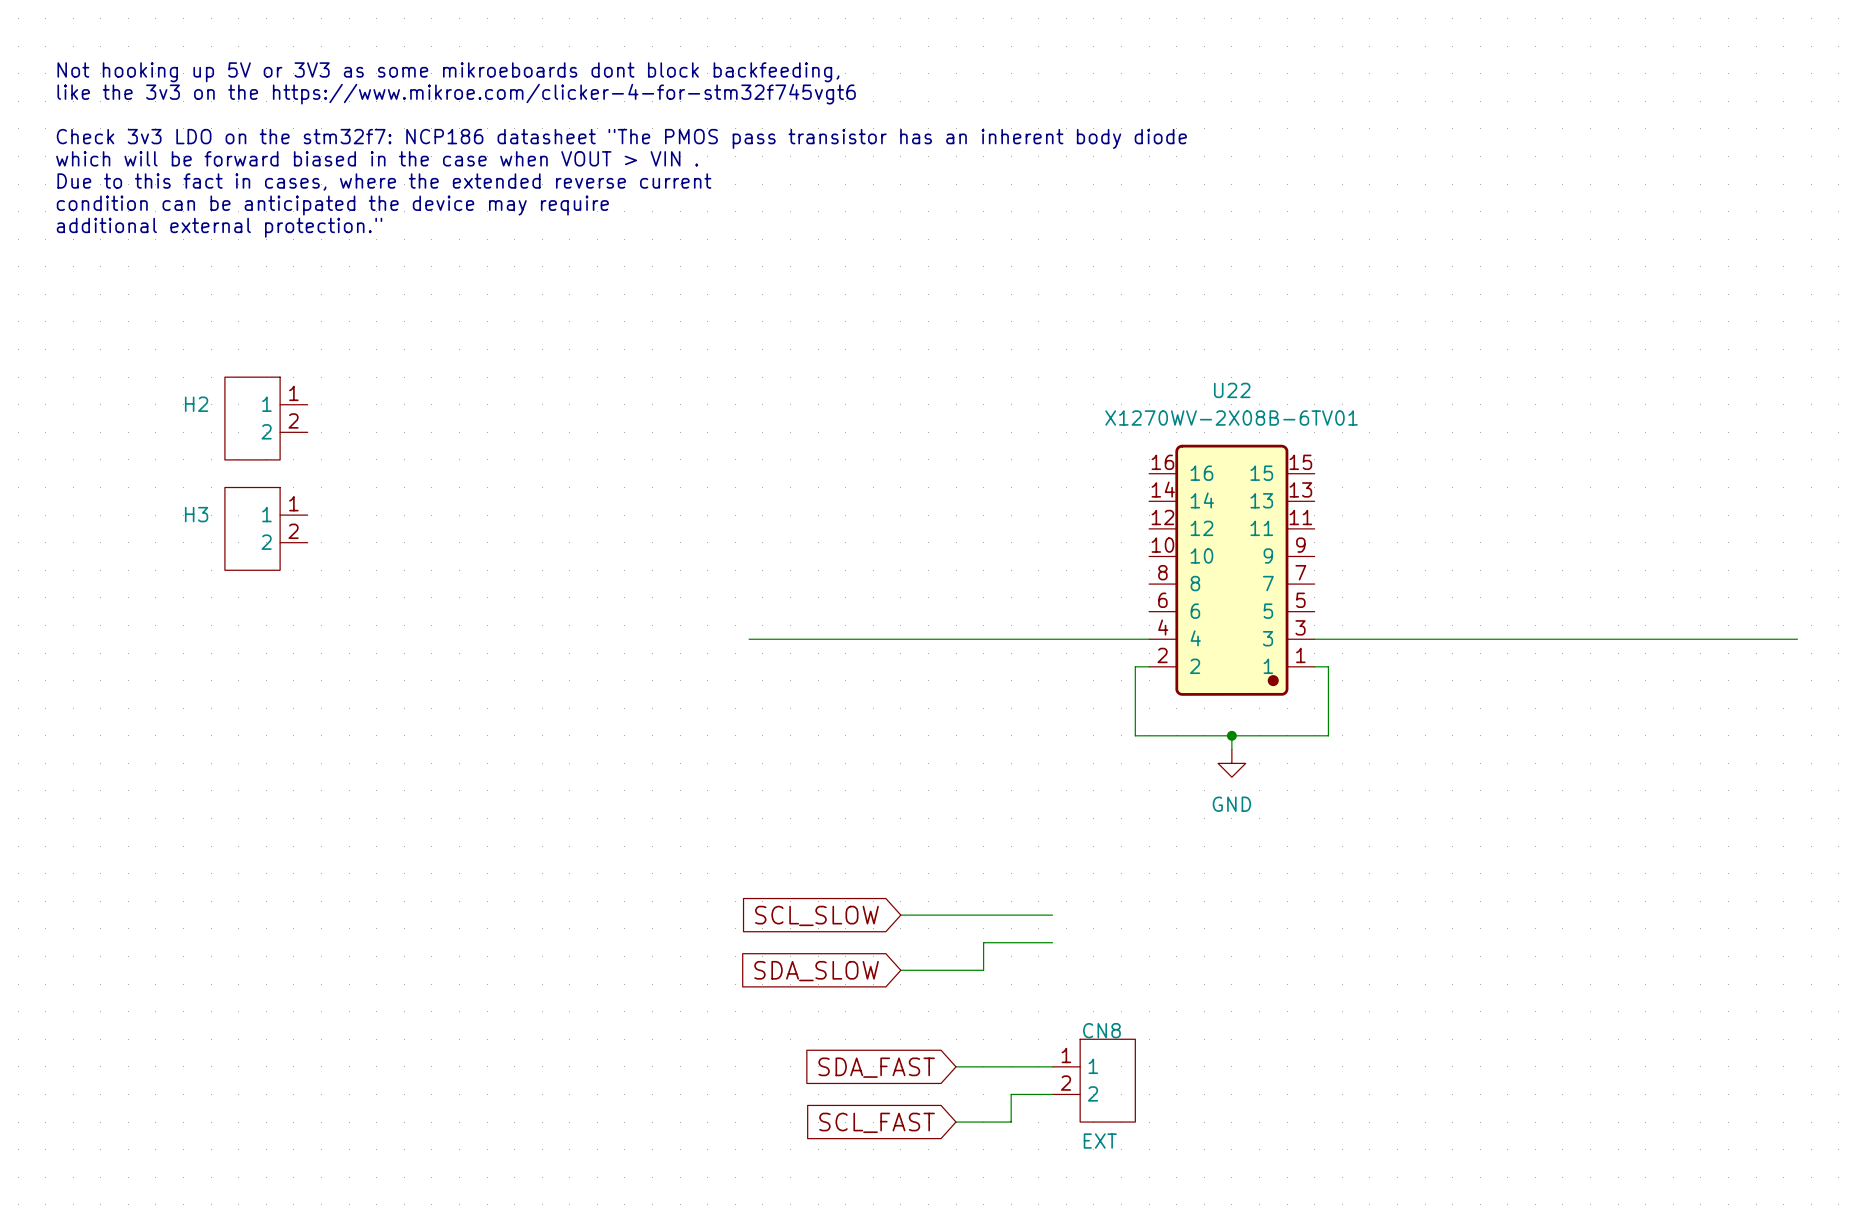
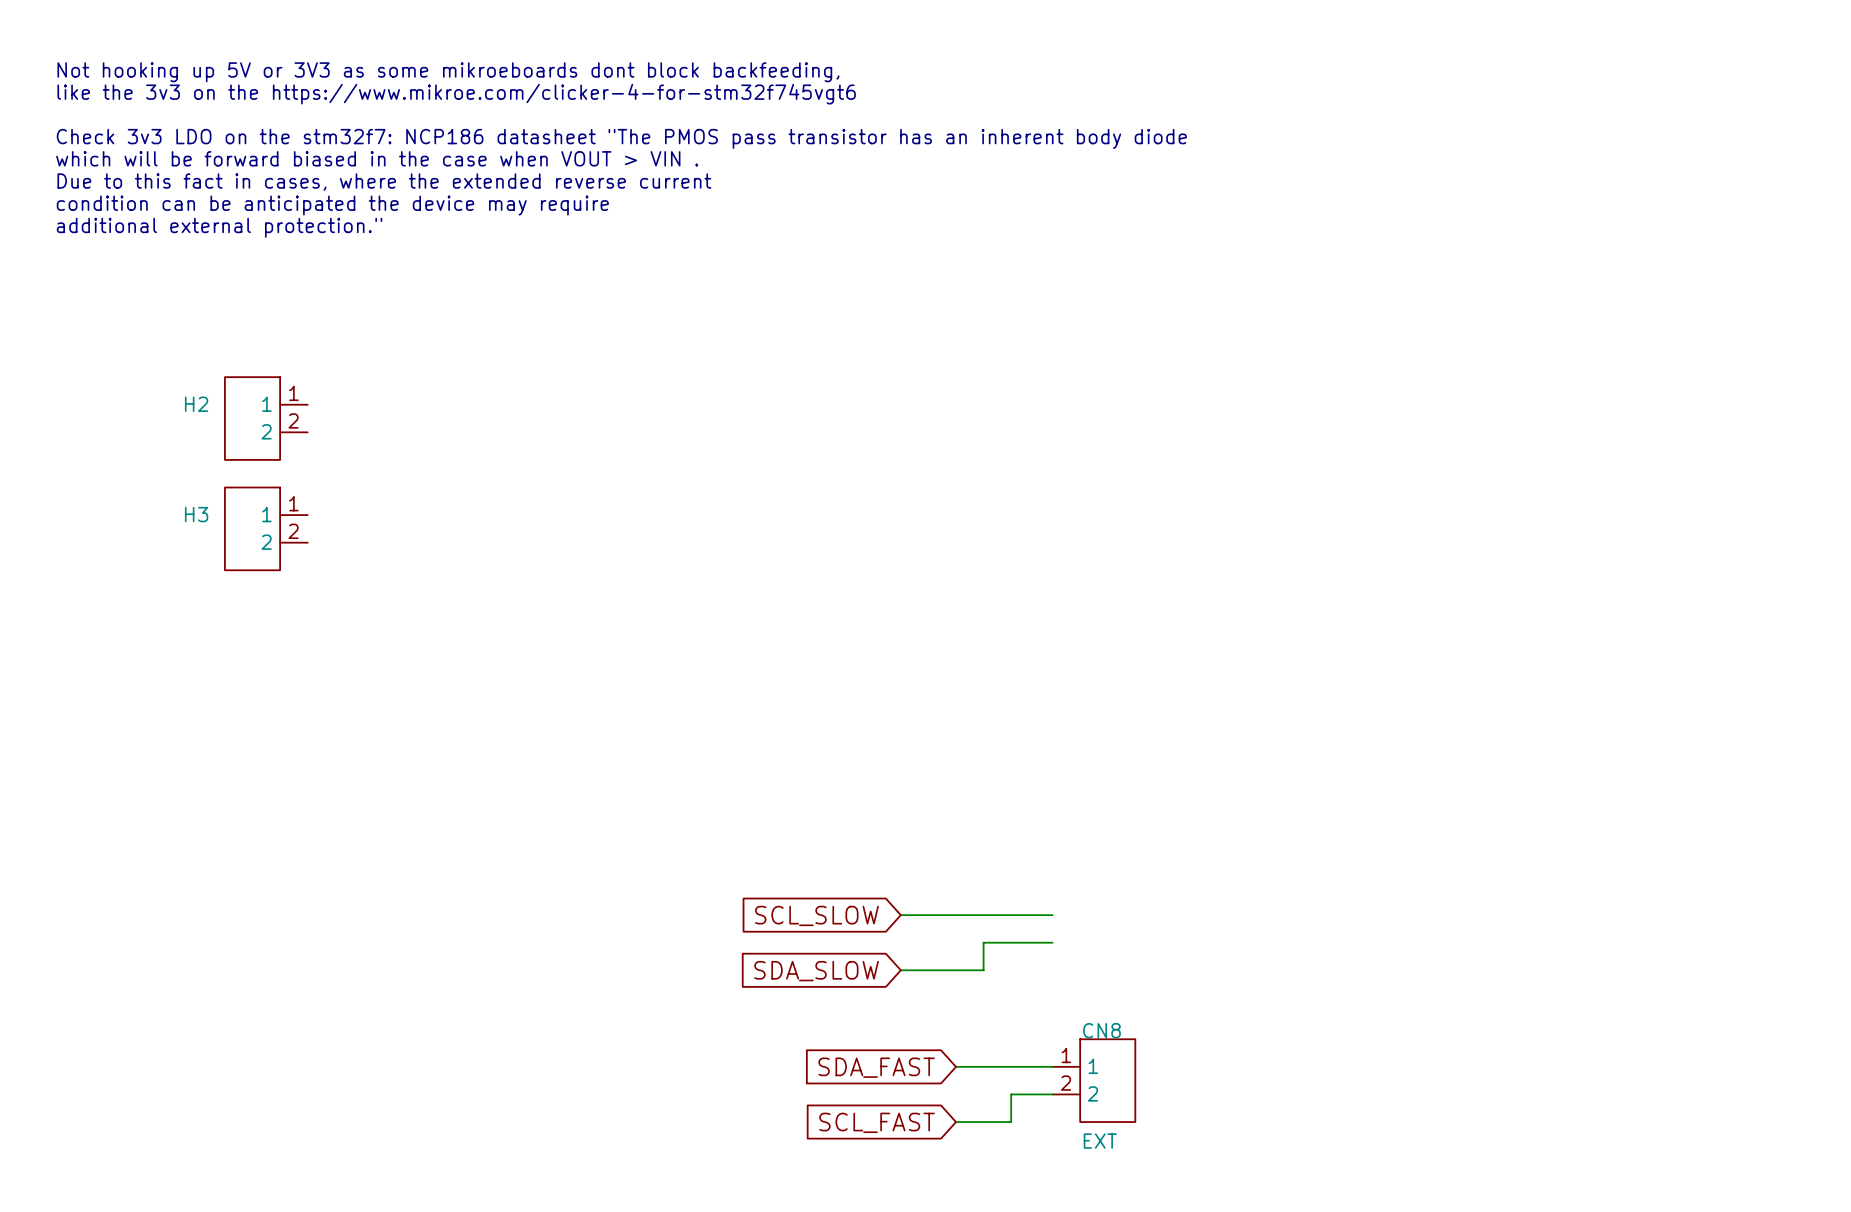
U22: X1270WV-2X08B-6TV01 (1231, 570) -> none
wire: (749, 639) (1149, 639) -> none
wire: (1314, 639) (1797, 639) -> none
wire: (1149, 666) (1135, 666) (1135, 735) (1328, 735) (1328, 666) (1314, 666) -> none
wire: (1231, 735) (1231, 749) -> none
junction: (1231, 735) -> none
power symbol: GND (1231, 763) -> none

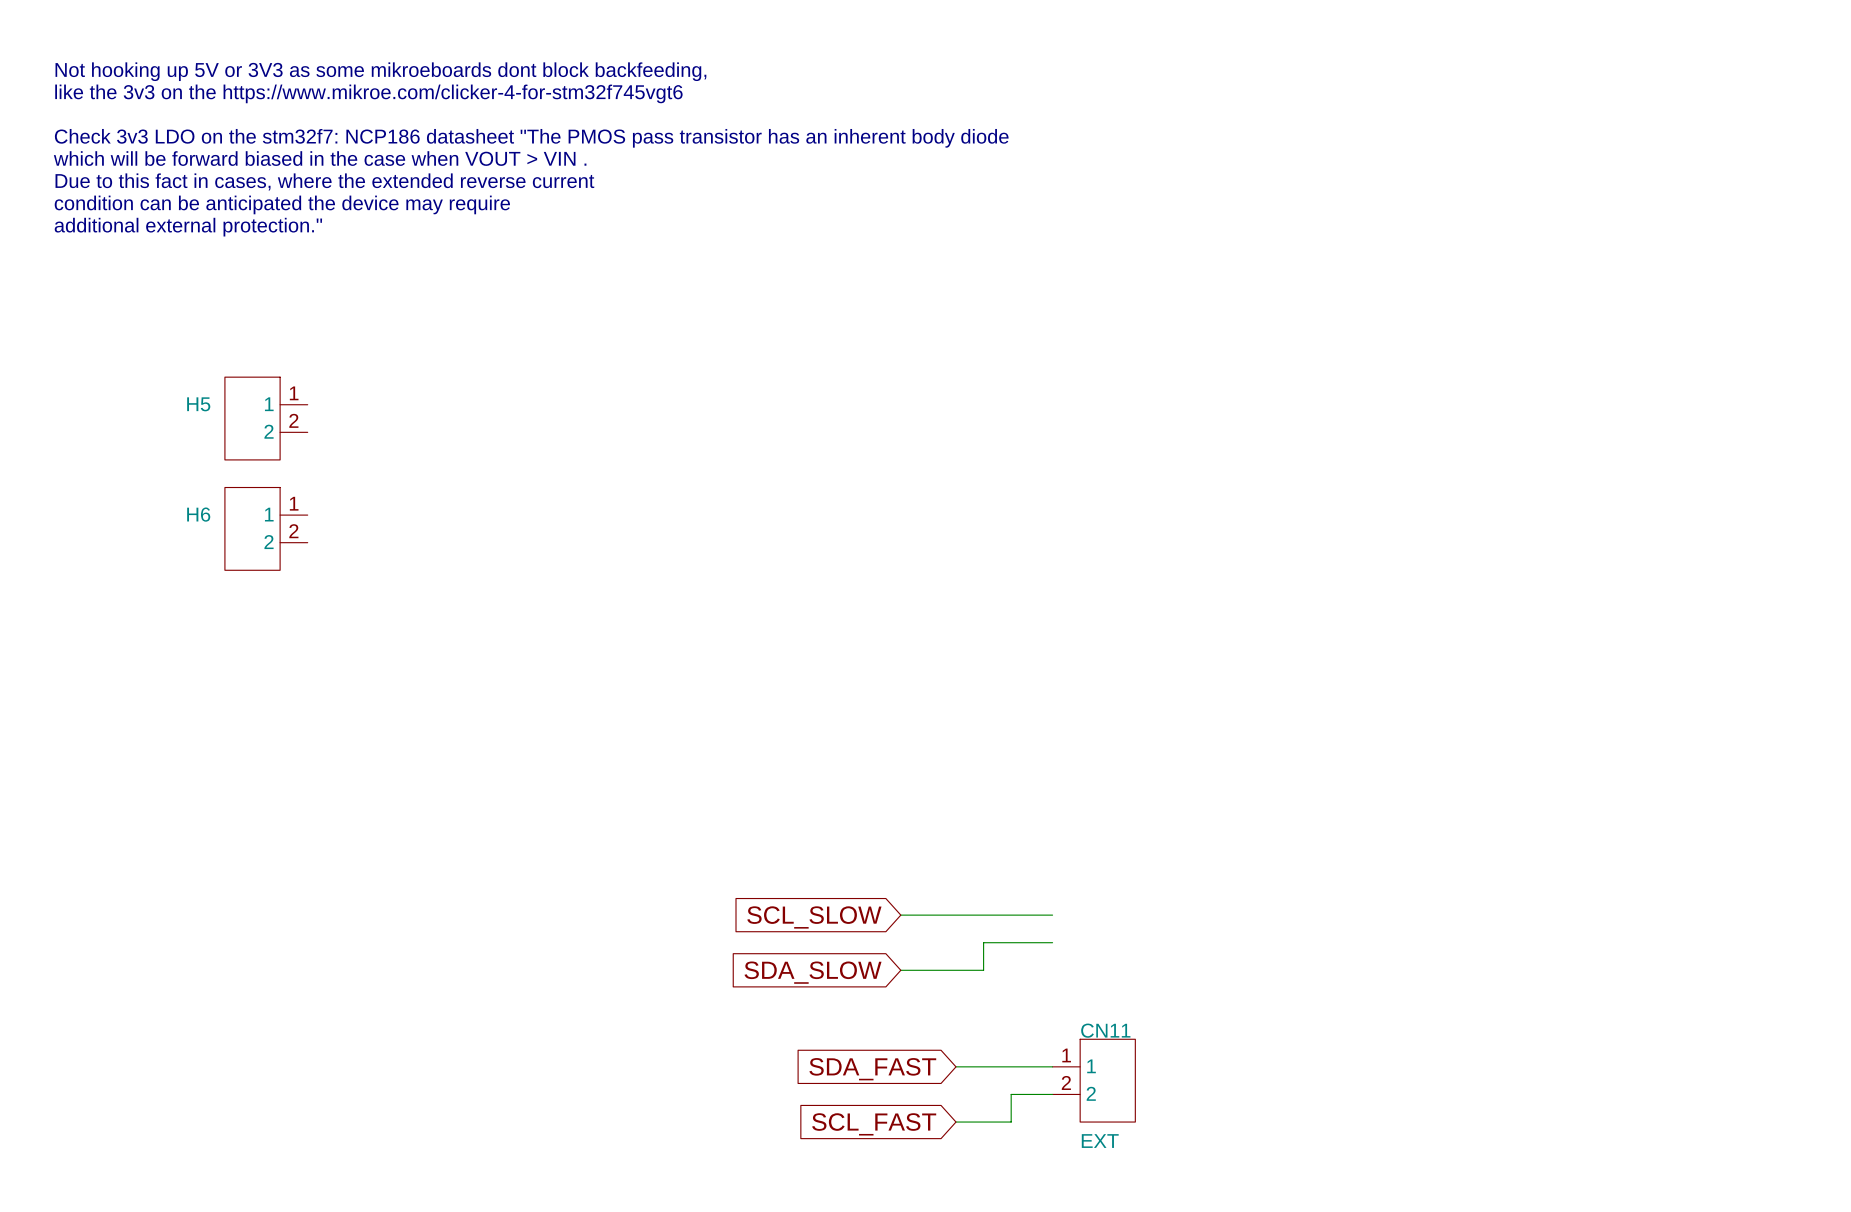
H2 name: H2 (196, 404) -> H5 (198, 404)
H3 name: H3 (196, 514) -> H6 (198, 514)
CN8 name: CN8 (1101, 1030) -> CN11 (1105, 1030)

